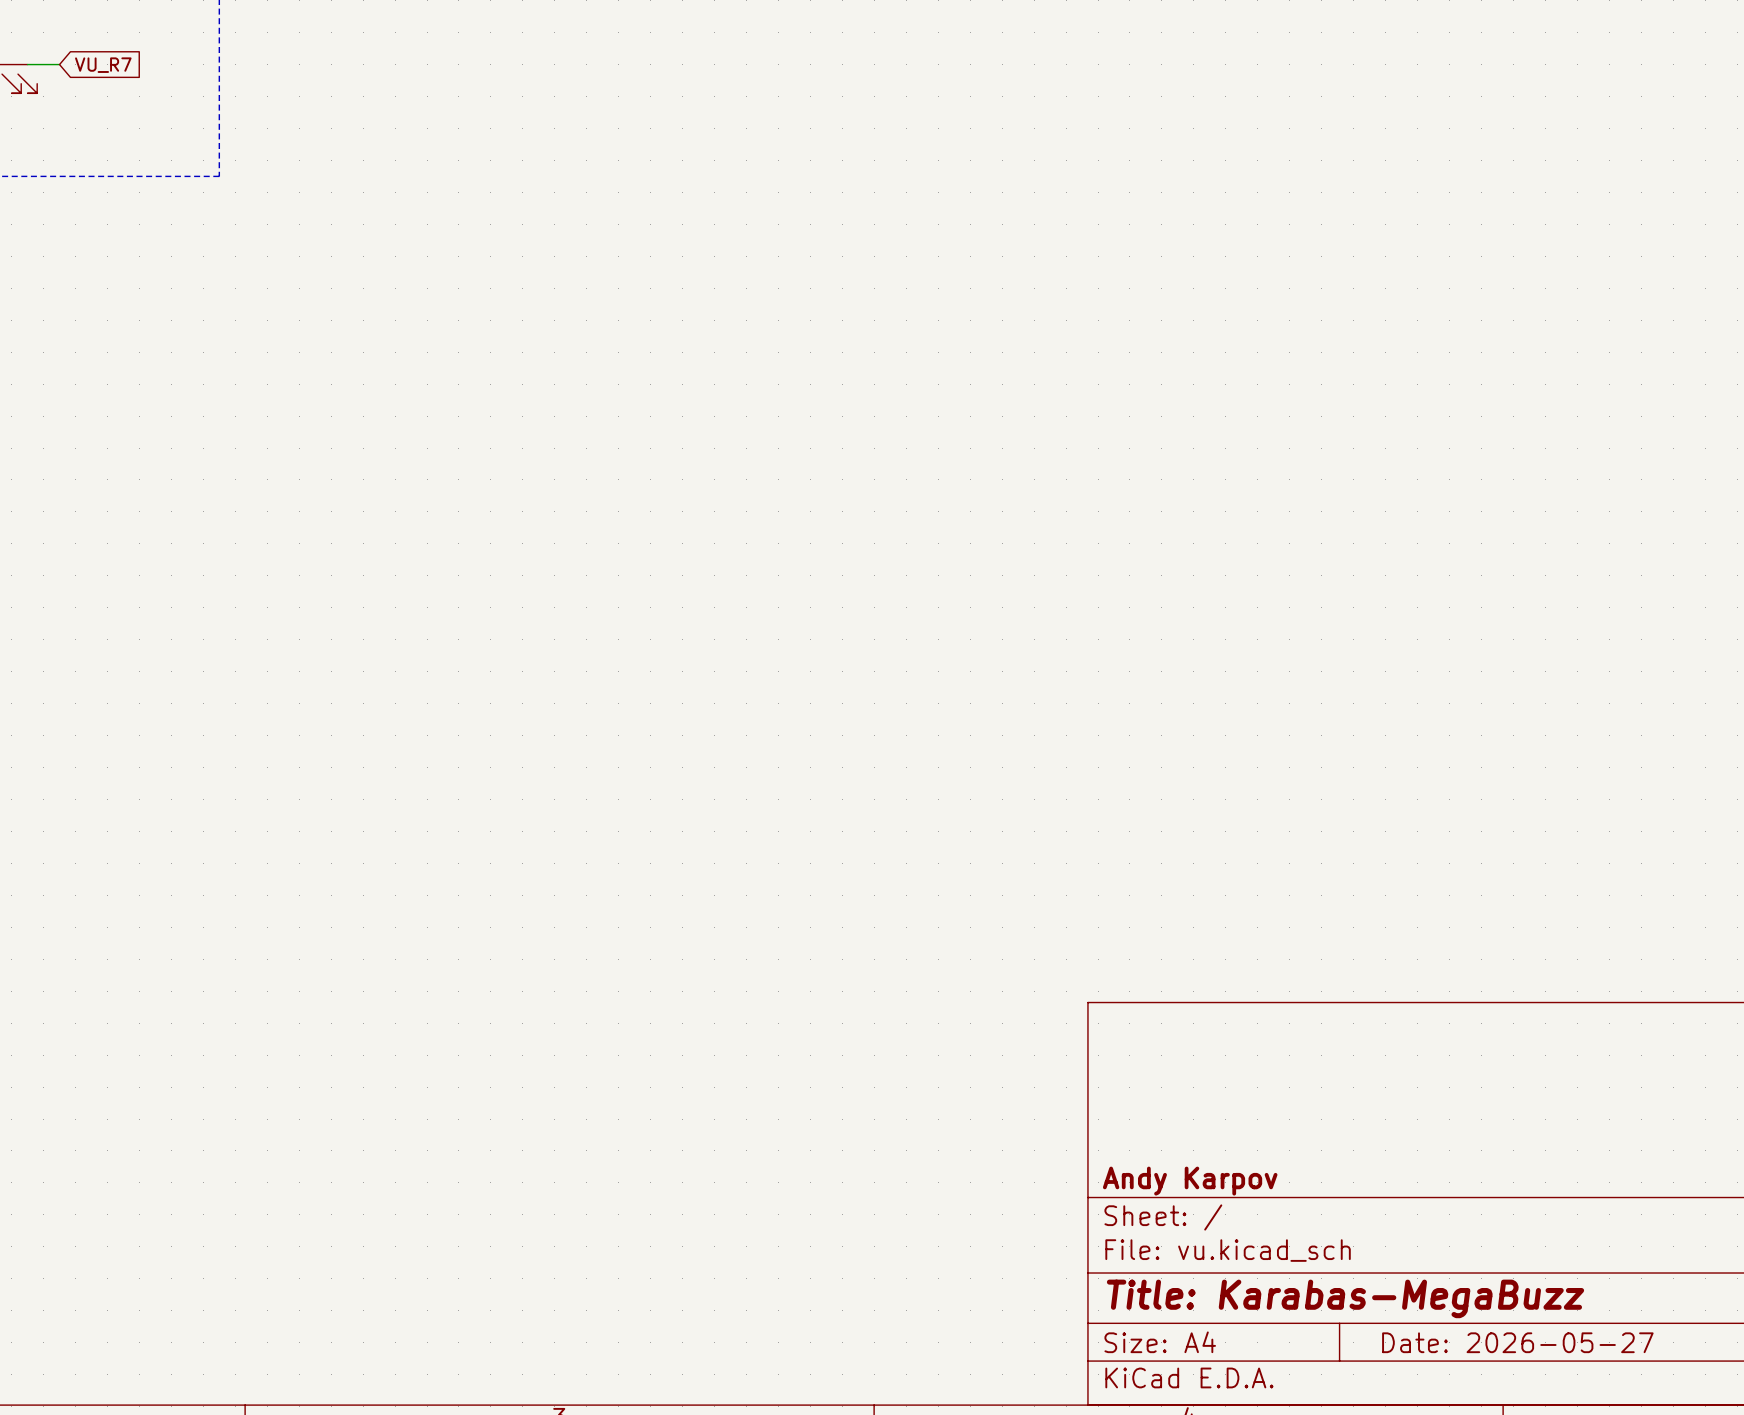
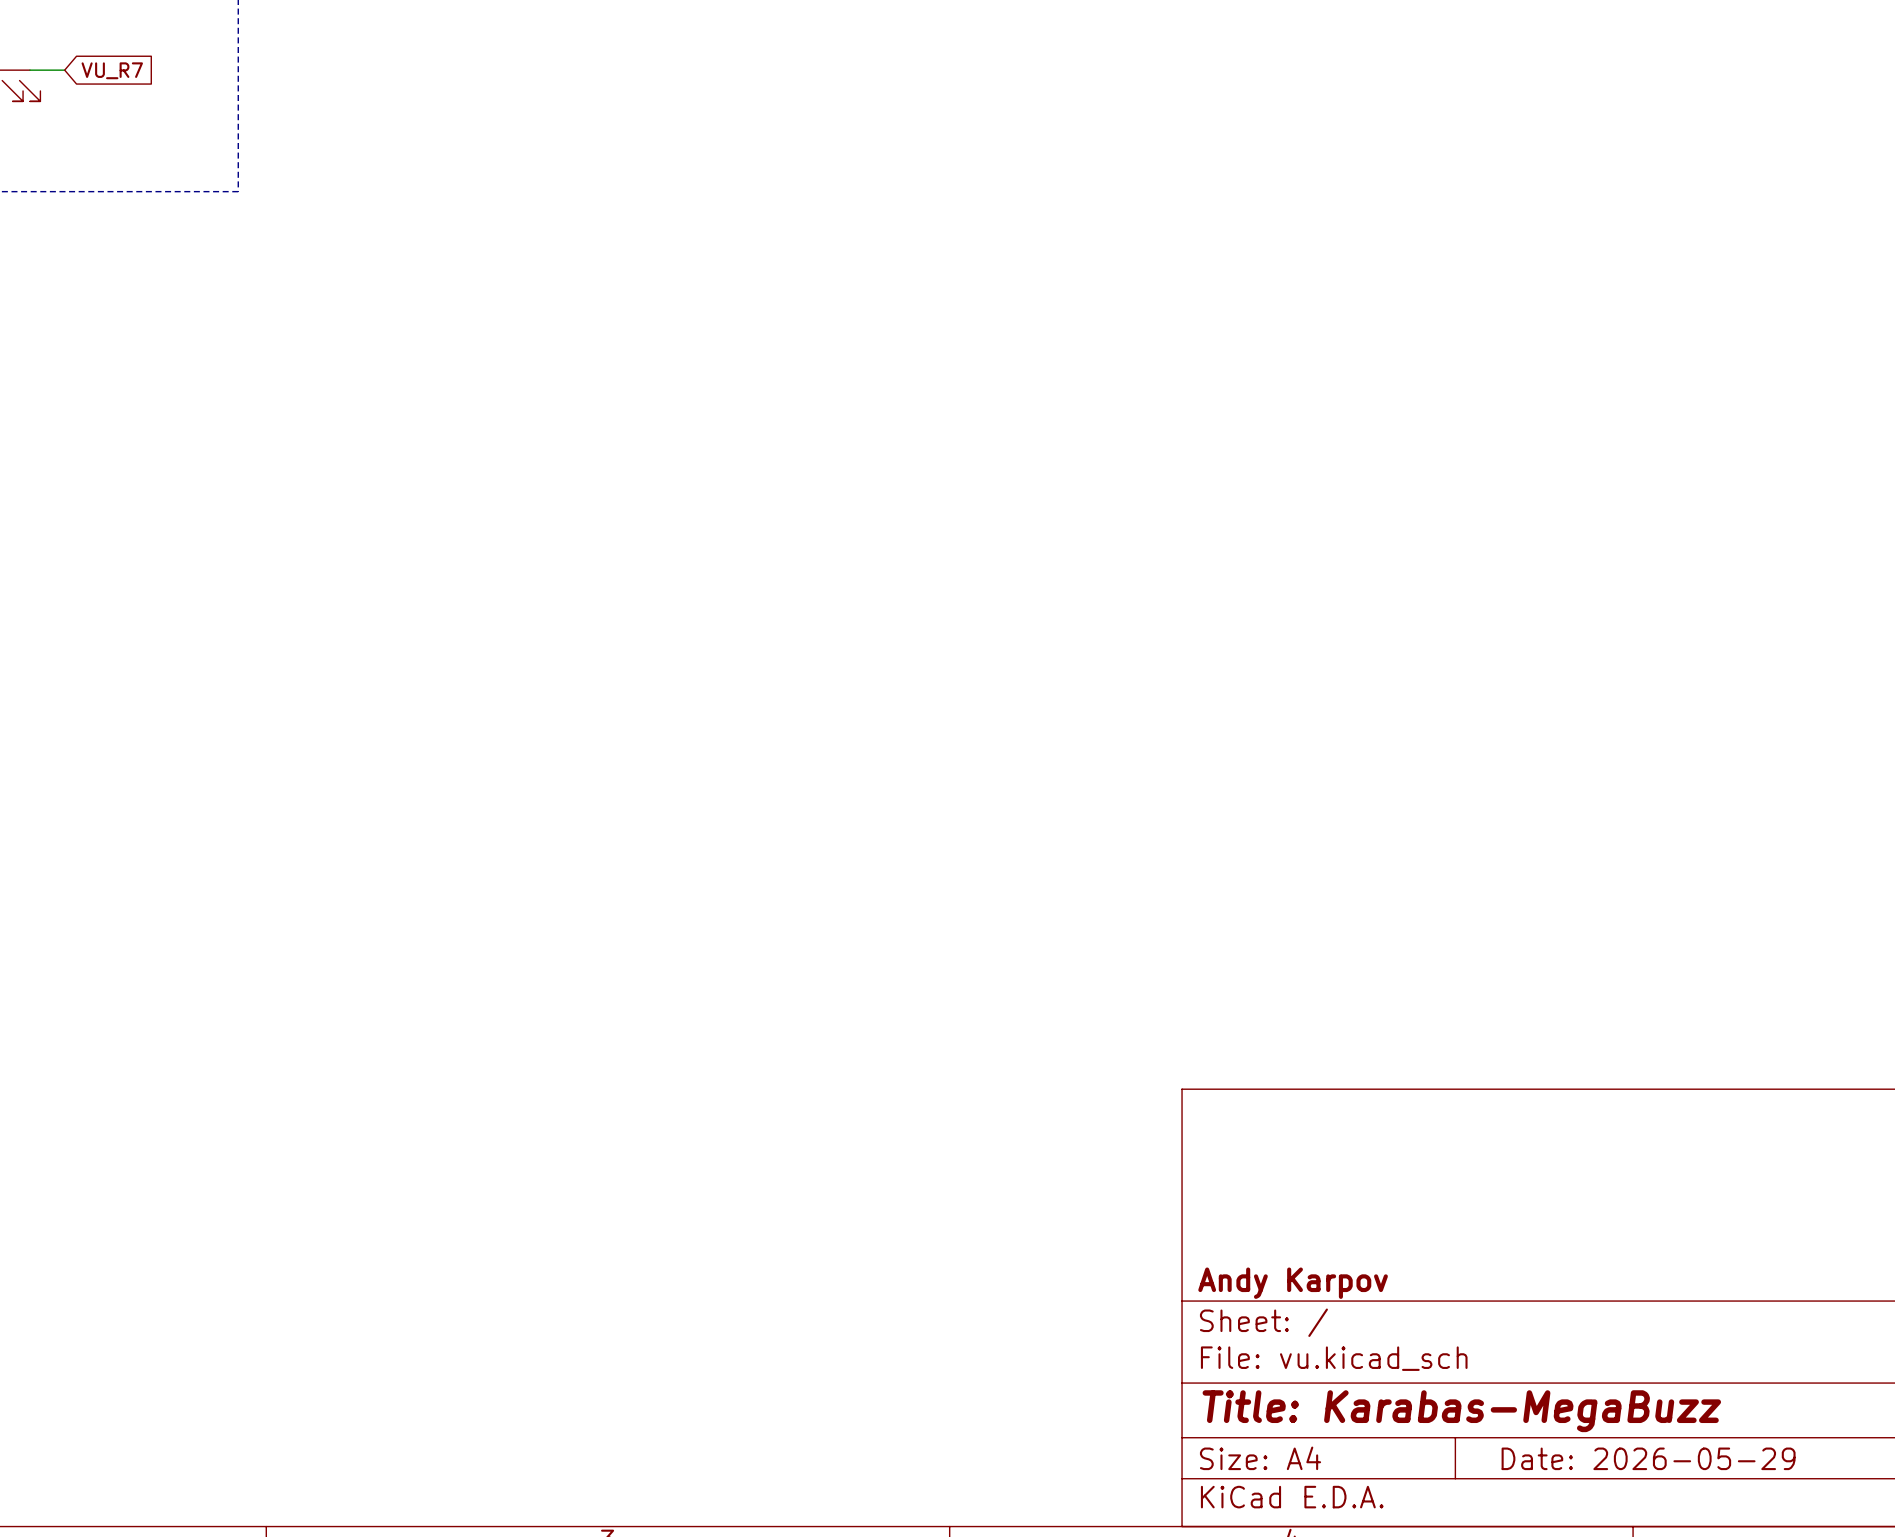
title block: Date: 2026-05-27 (1517, 1342) -> Date: 2026-05-29 (1648, 1458)

